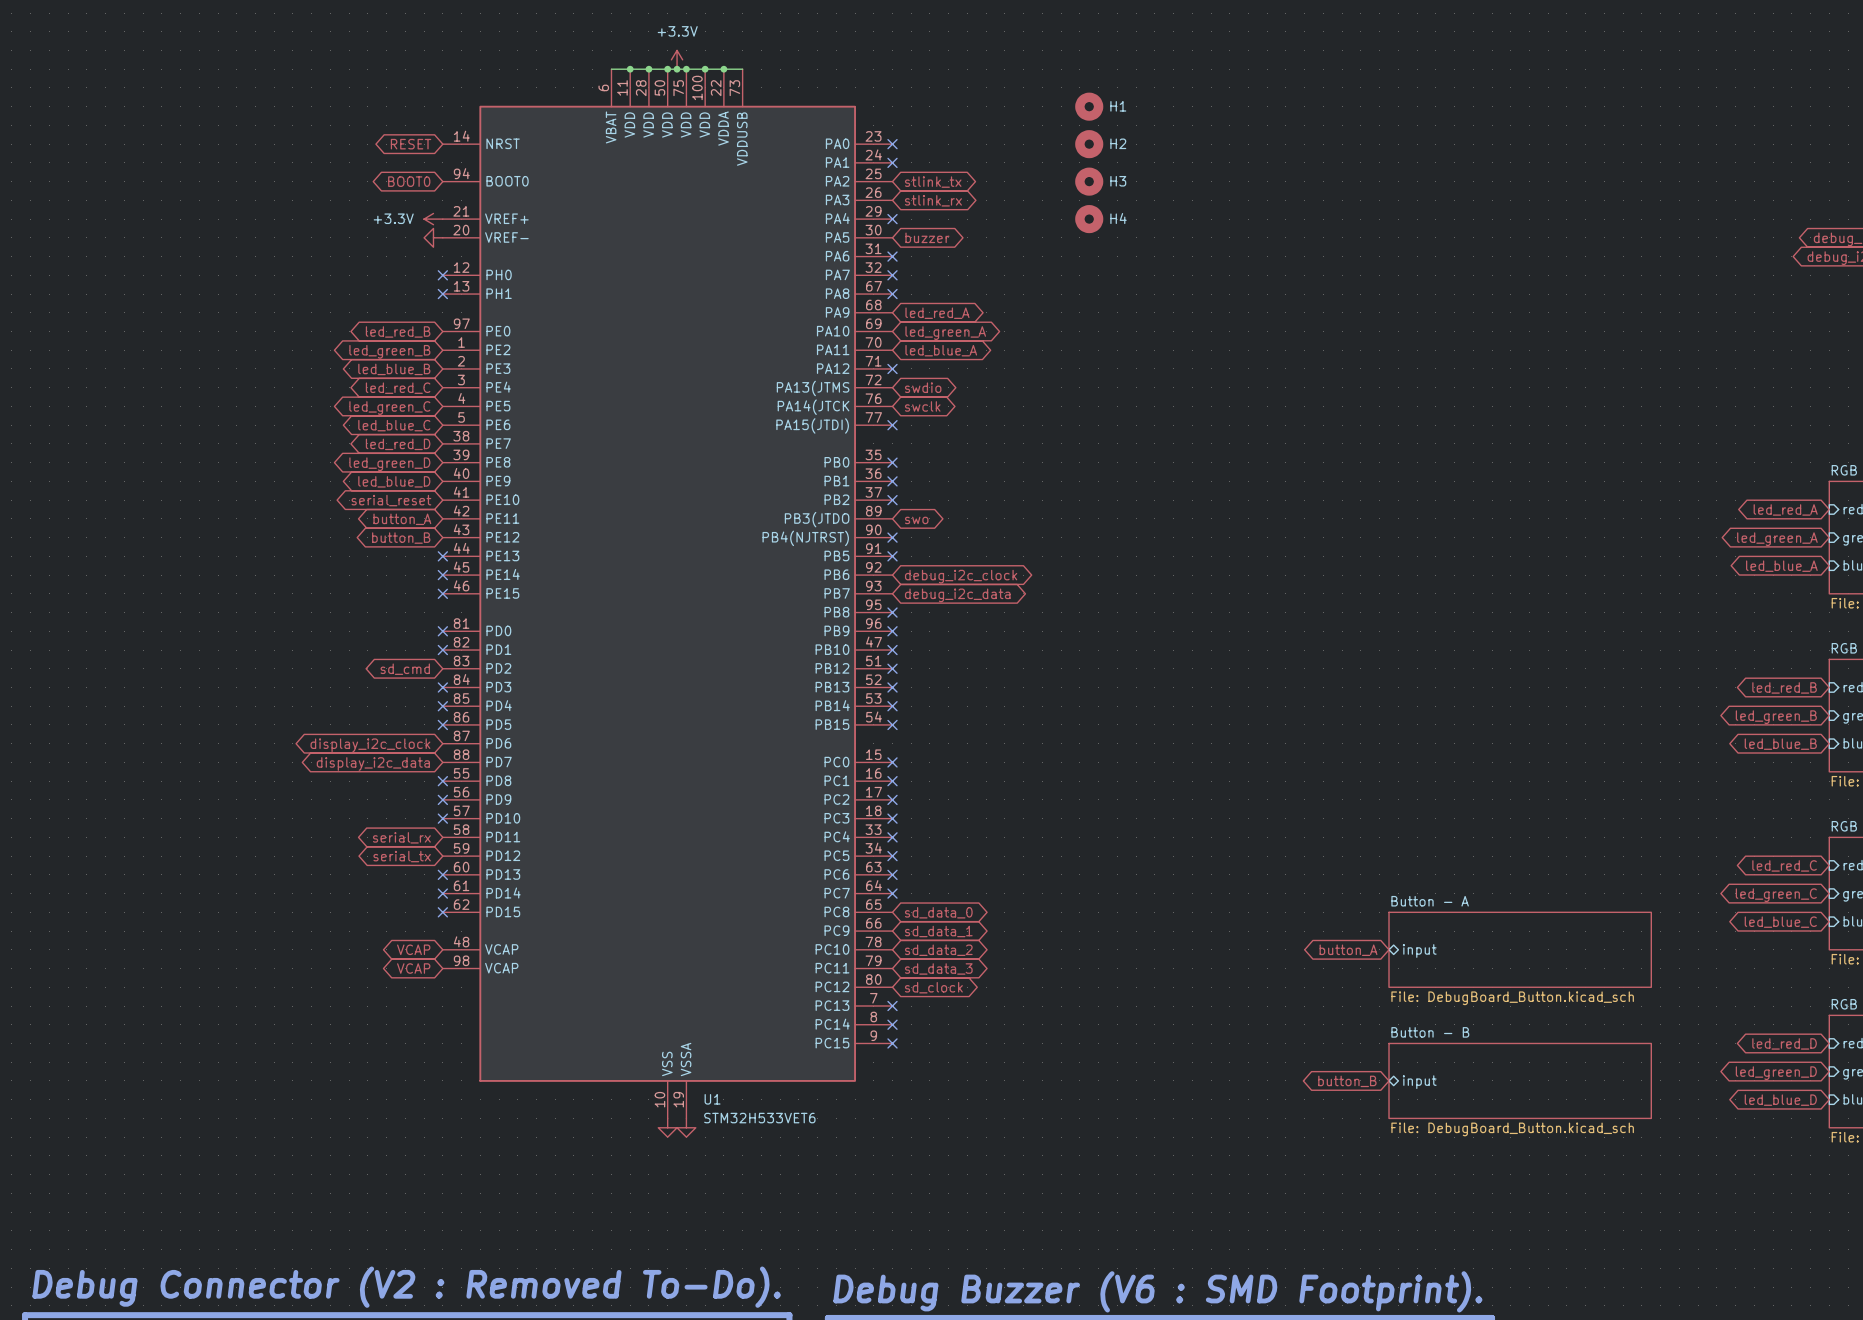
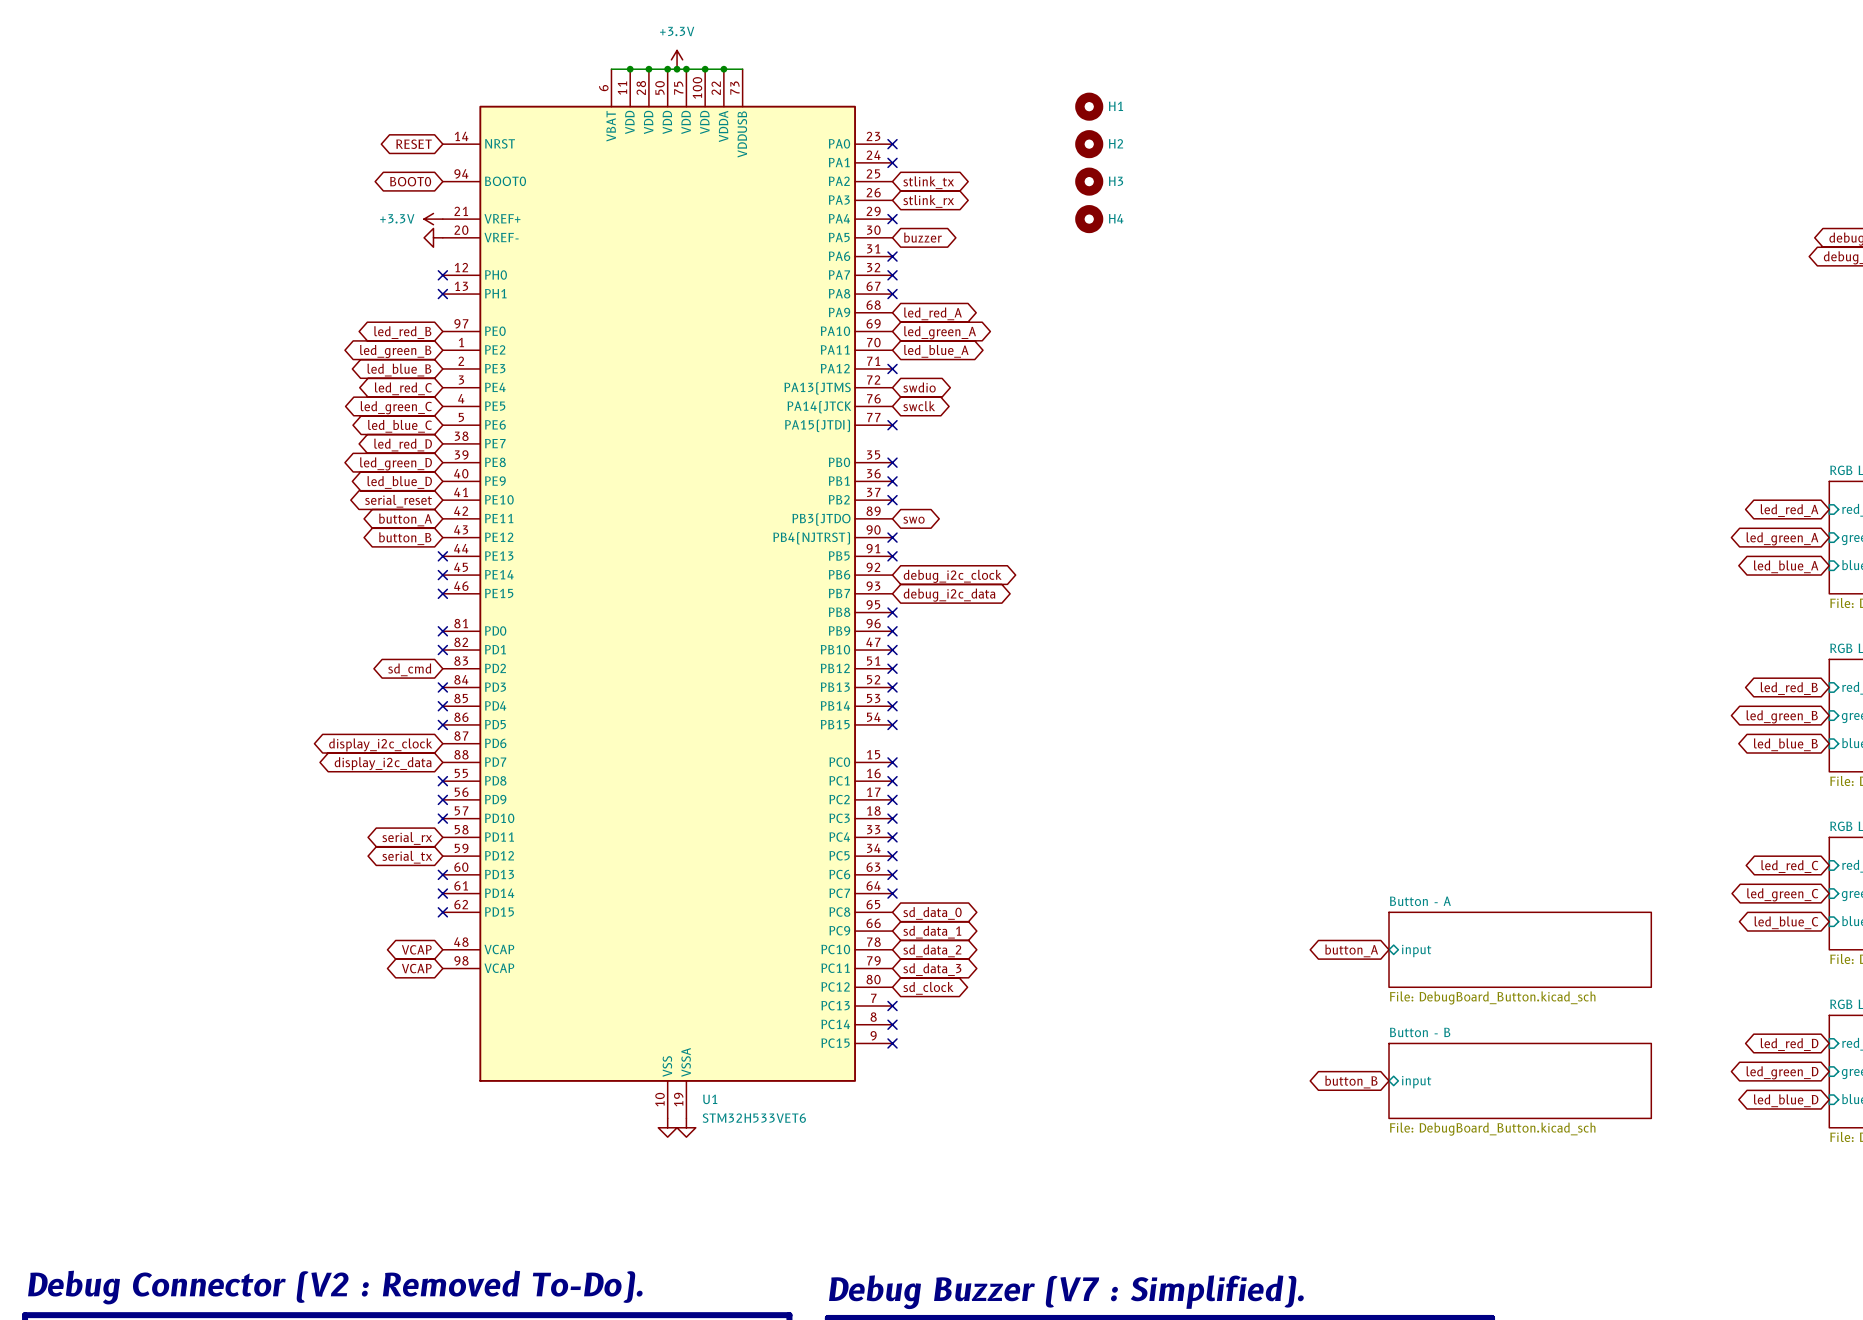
text: Debug Buzzer (V6 : SMD Footprint). (1157, 1291) -> Debug Buzzer (V7 : Simplified). (1066, 1292)

